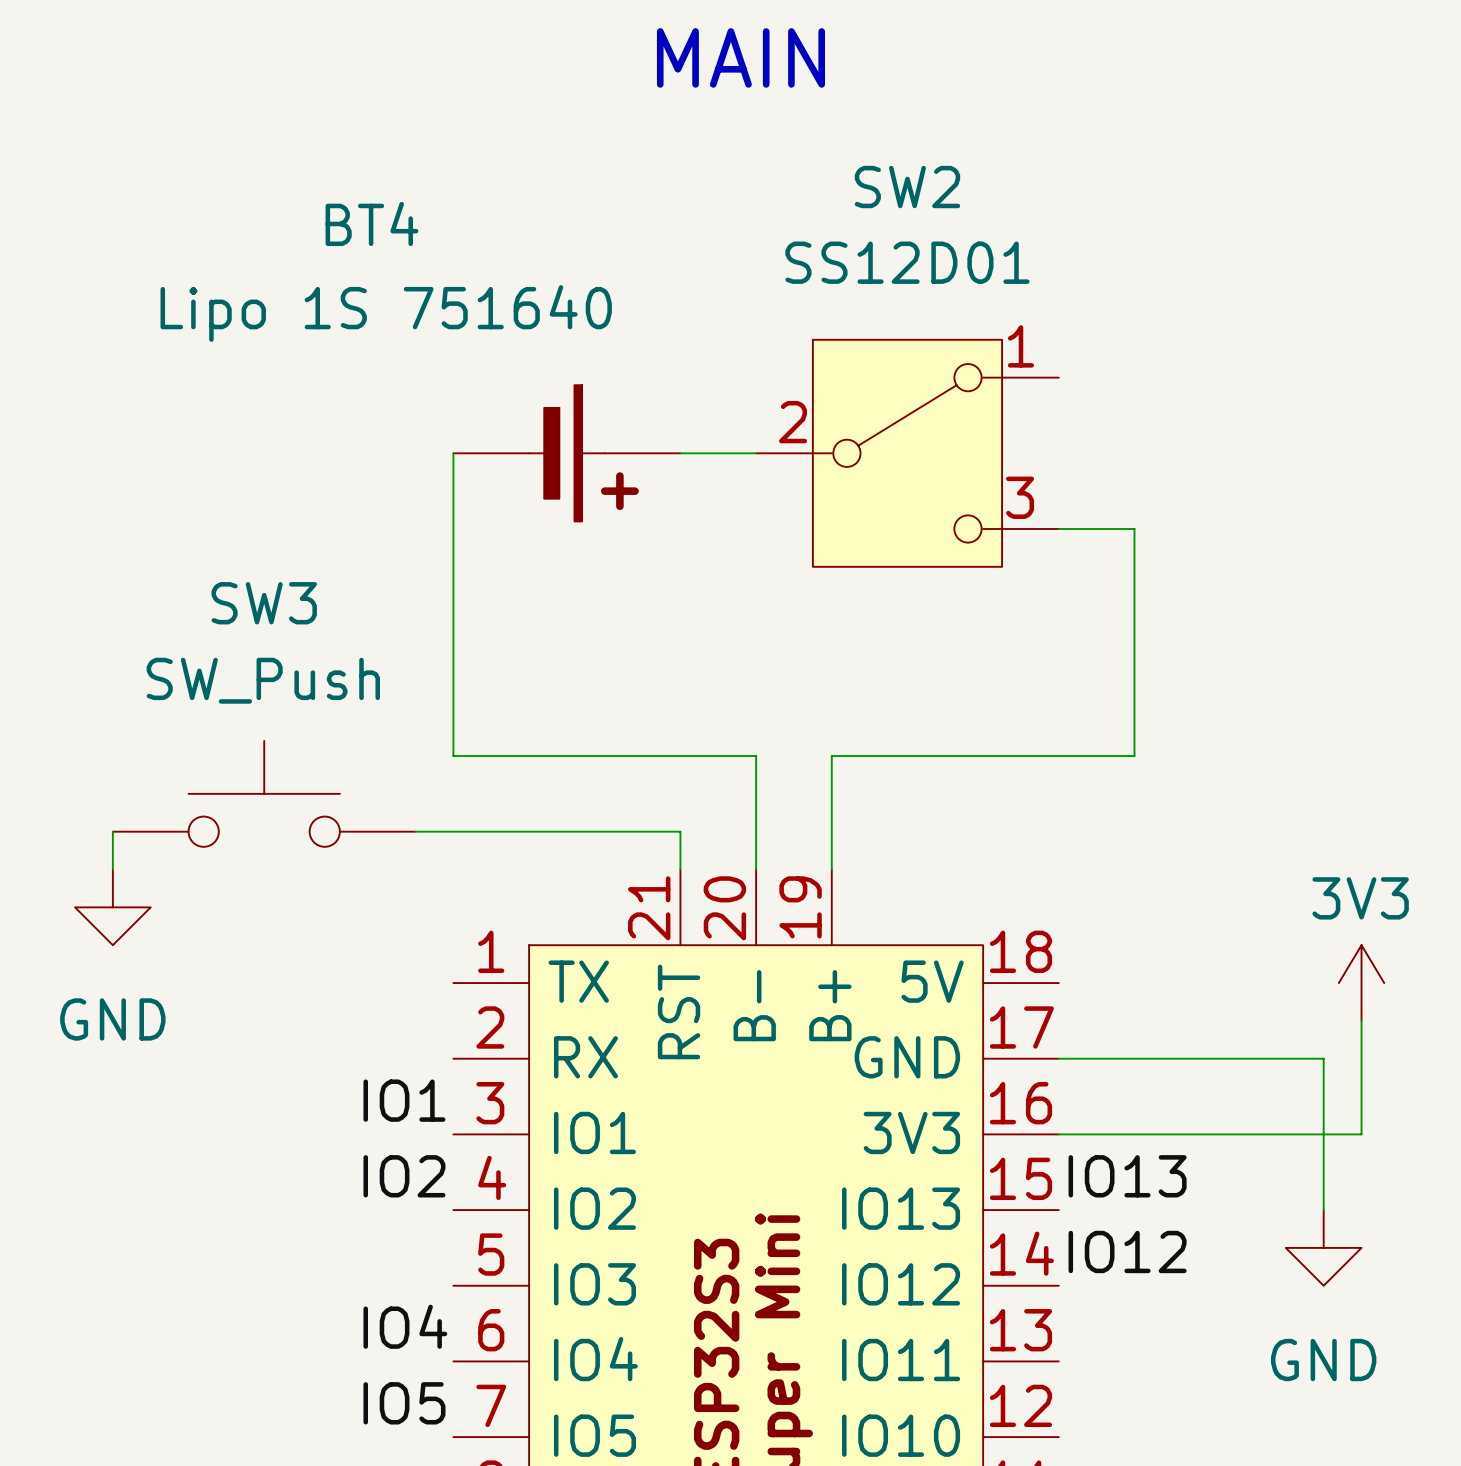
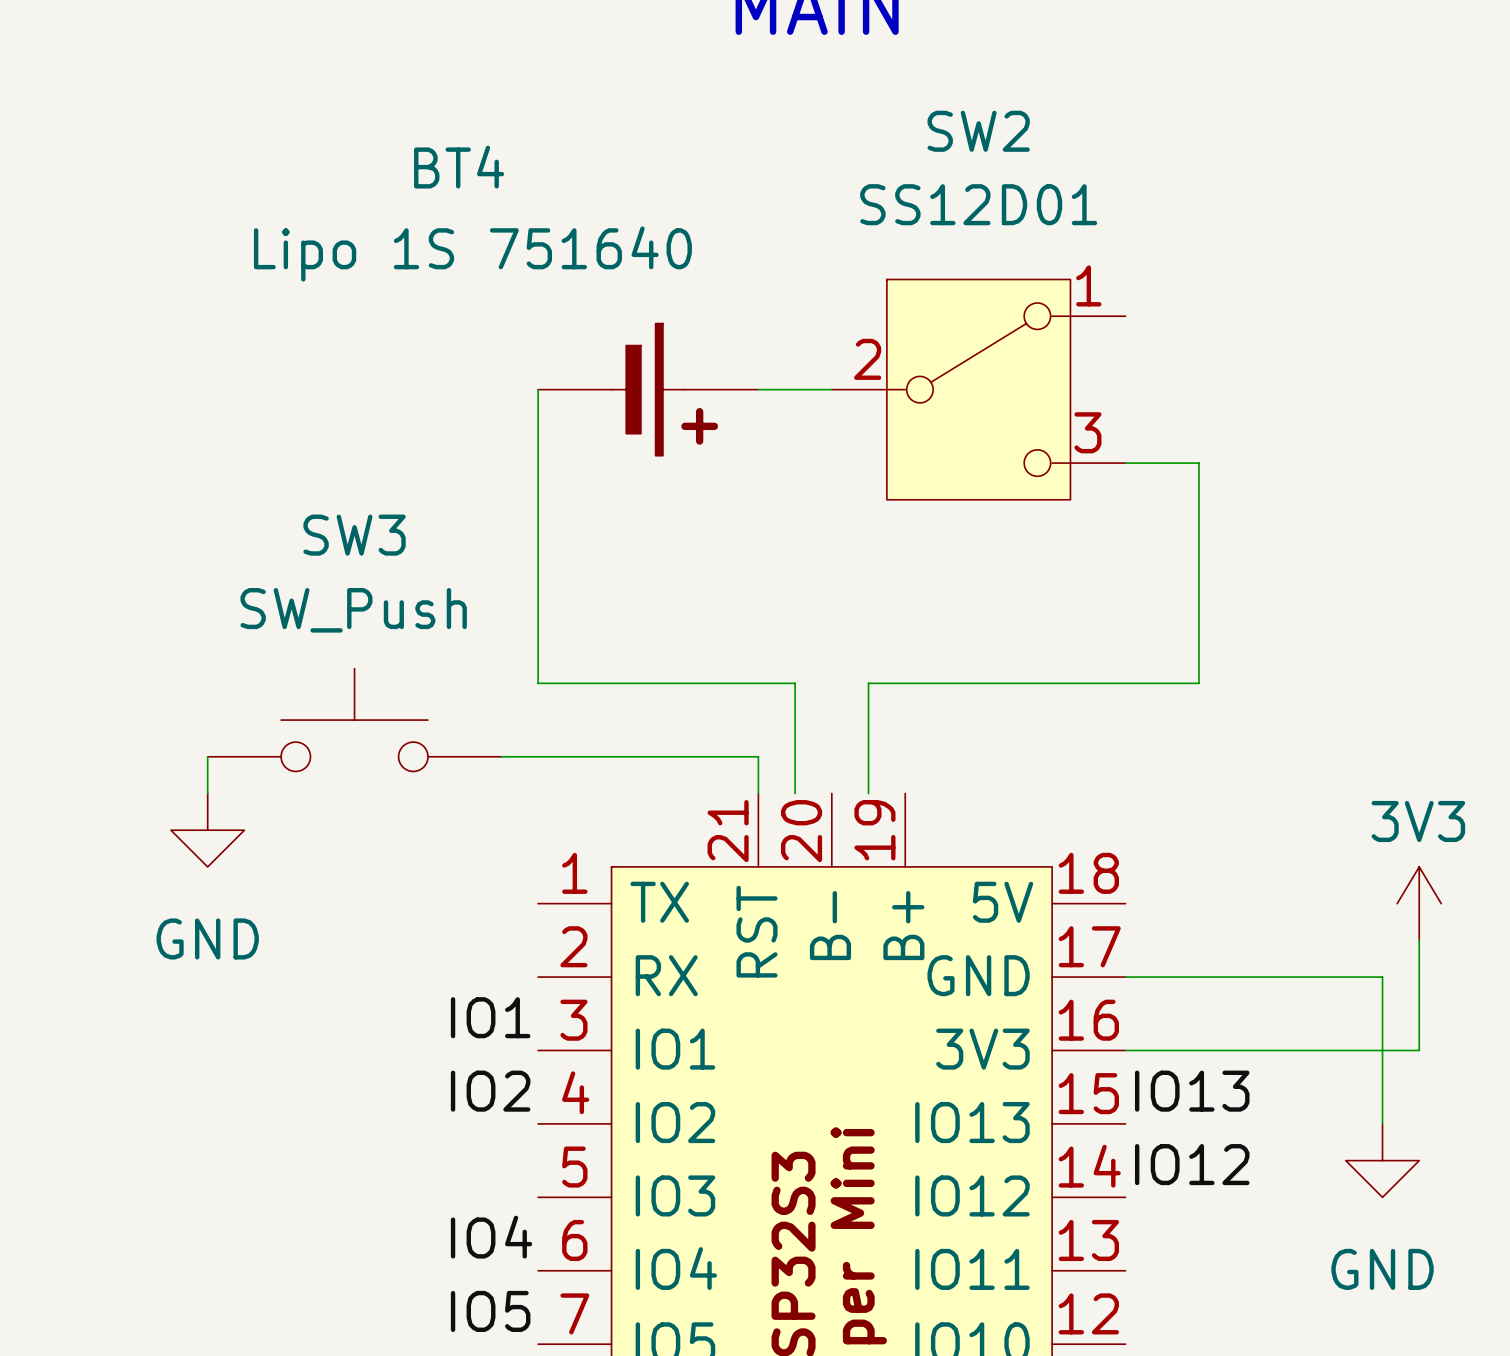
wire: (718, 756) (756, 756) (756, 869) -> (795, 683) (795, 793)
wire: (831, 756) (831, 869) -> (905, 683) (868, 683) (868, 793)

